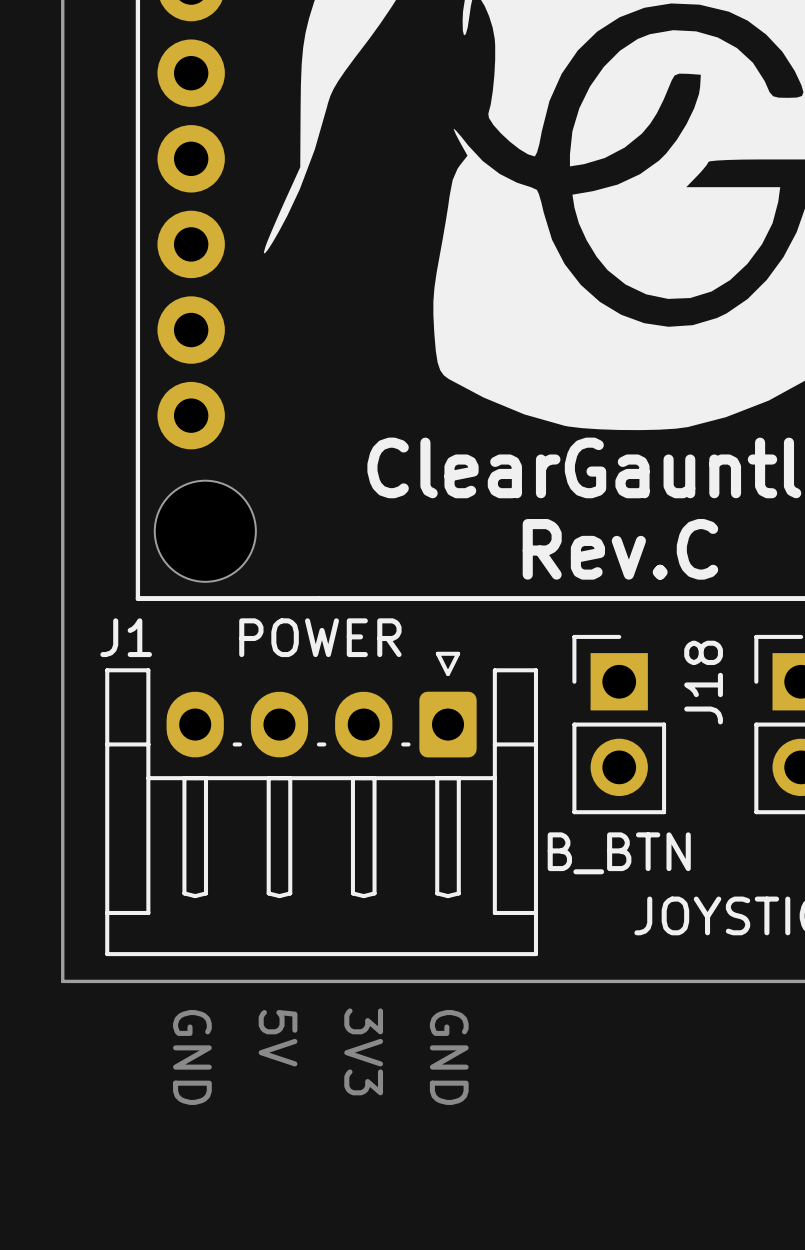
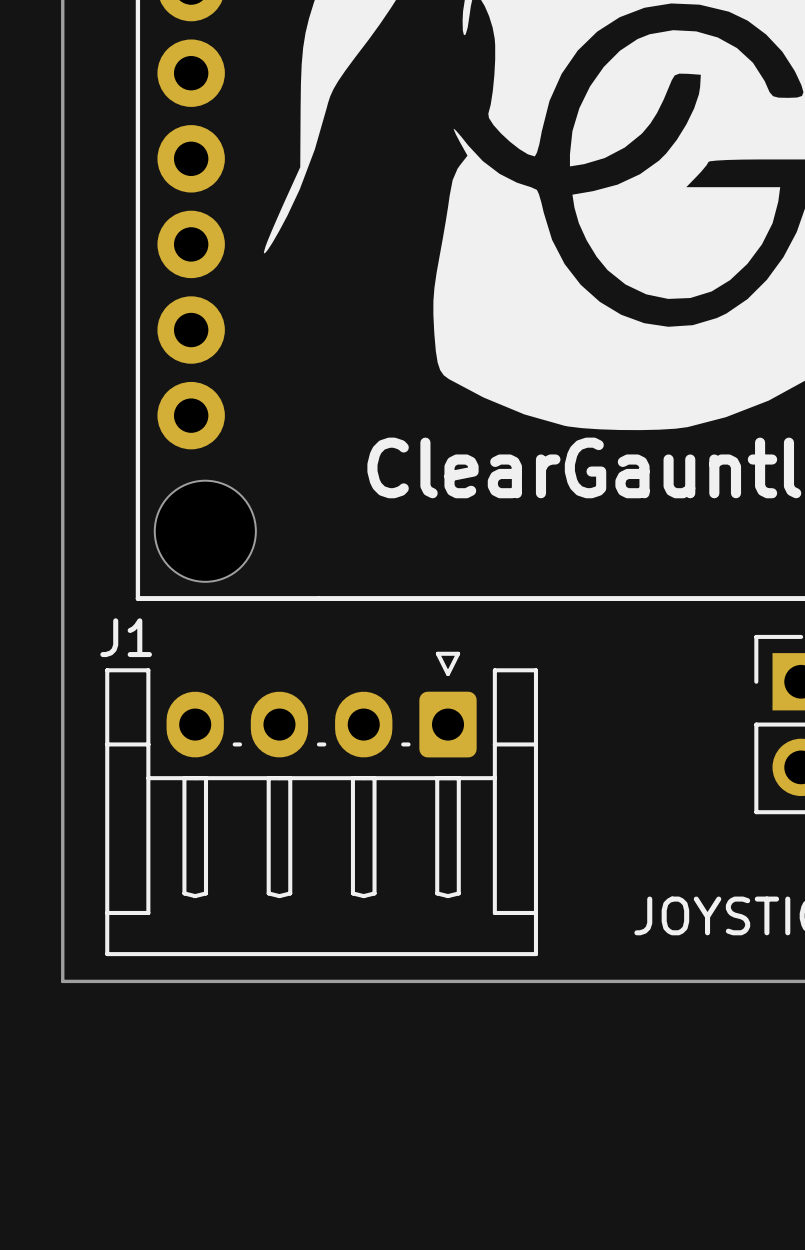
text: Rev.C (620, 549) -> none
text: POWER (320, 637) -> none
J18: (619, 724) -> none
text: B_BTN (619, 853) -> none
text: 5V (278, 1038) -> none
text: 3V3 (363, 1051) -> none
text: GND (192, 1057) -> none
text: GND (449, 1057) -> none

